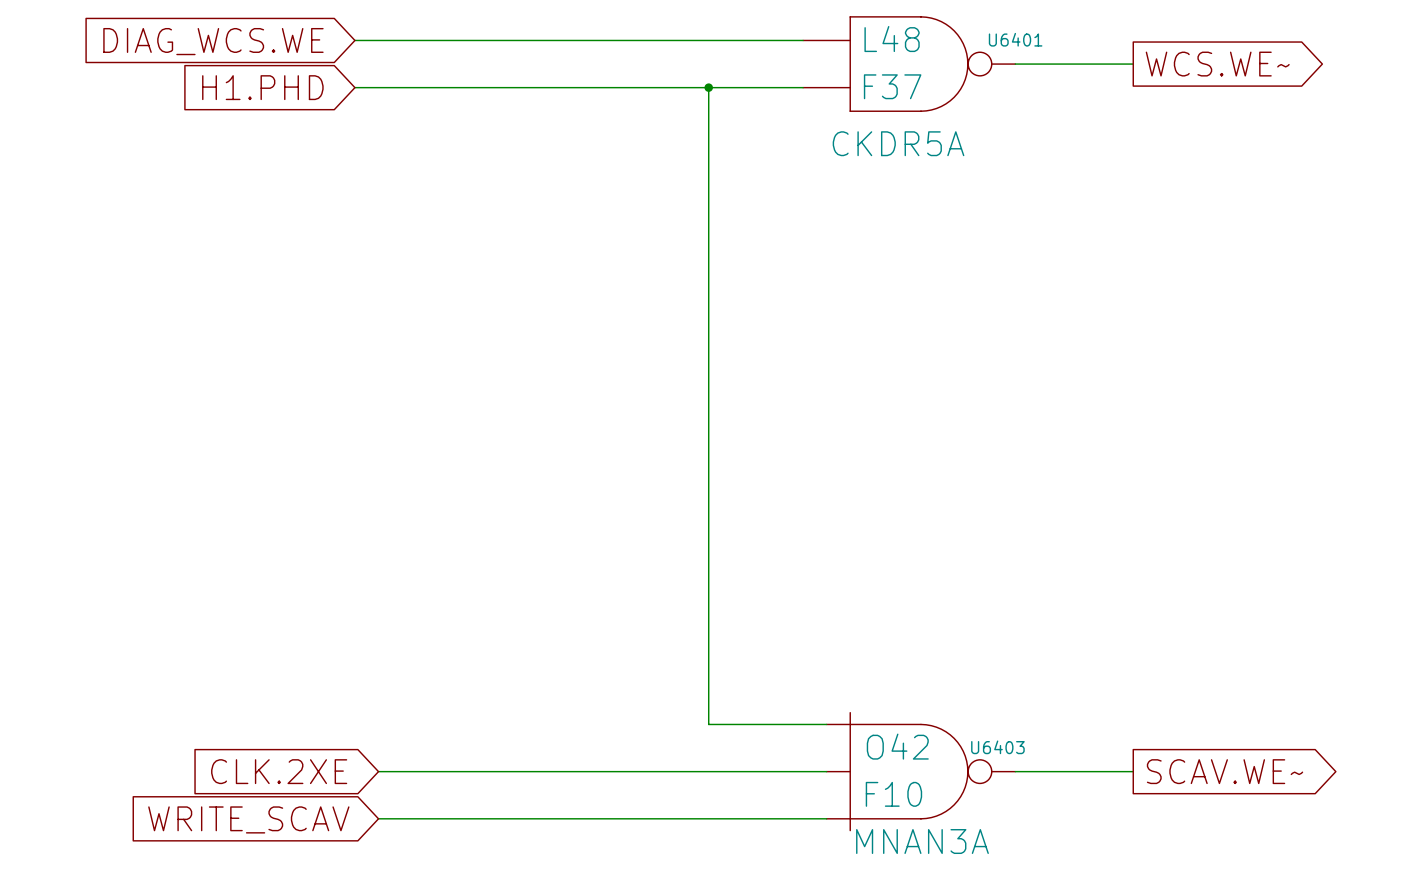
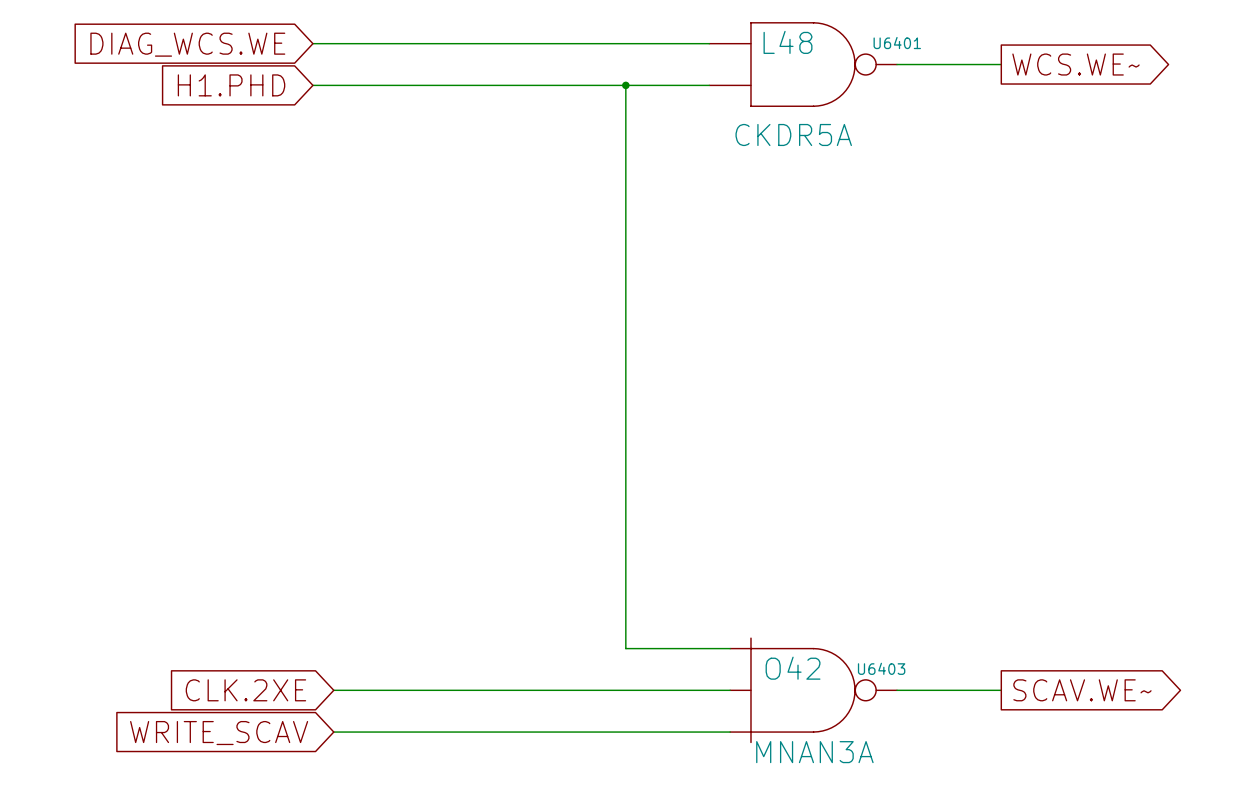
U6401 value: F37 (892, 86) -> none
U6403 value: F10 (893, 794) -> none

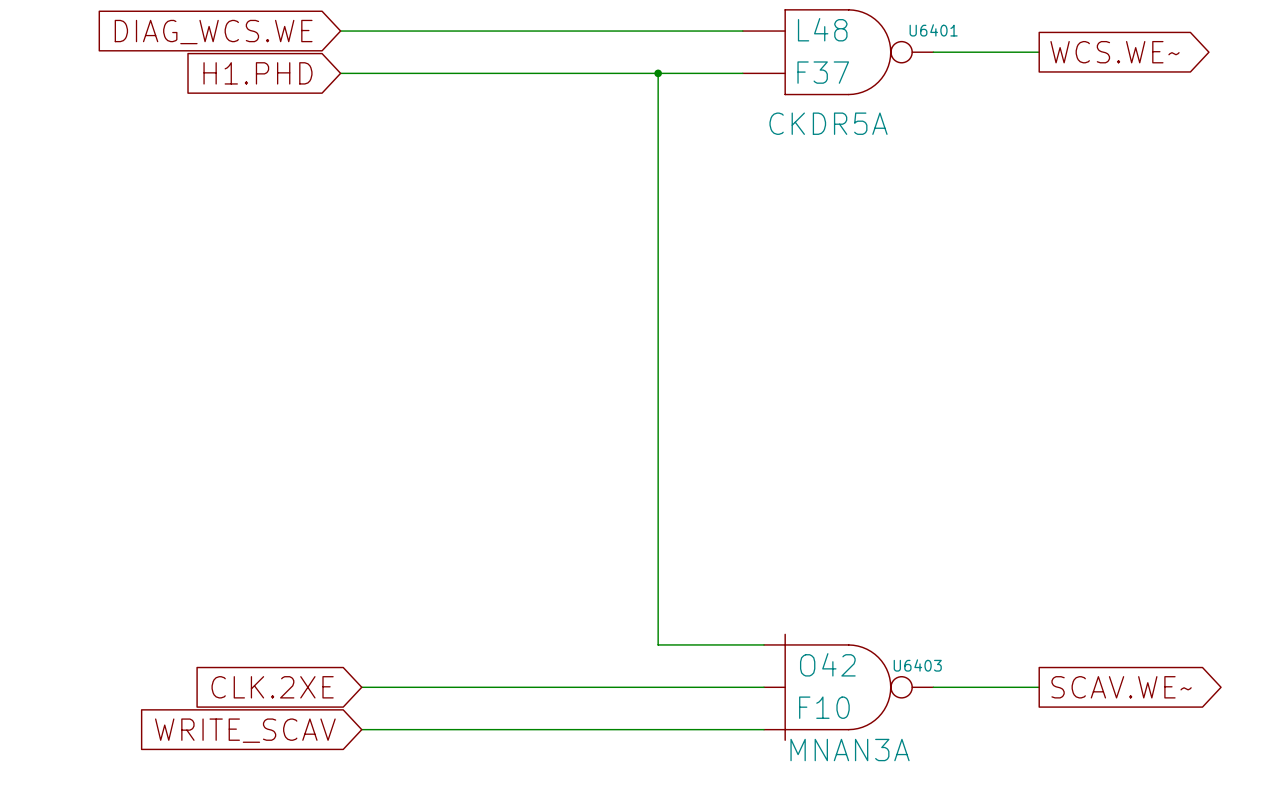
U6401 value: none -> F37 (823, 72)
U6403 value: none -> F10 (824, 707)

